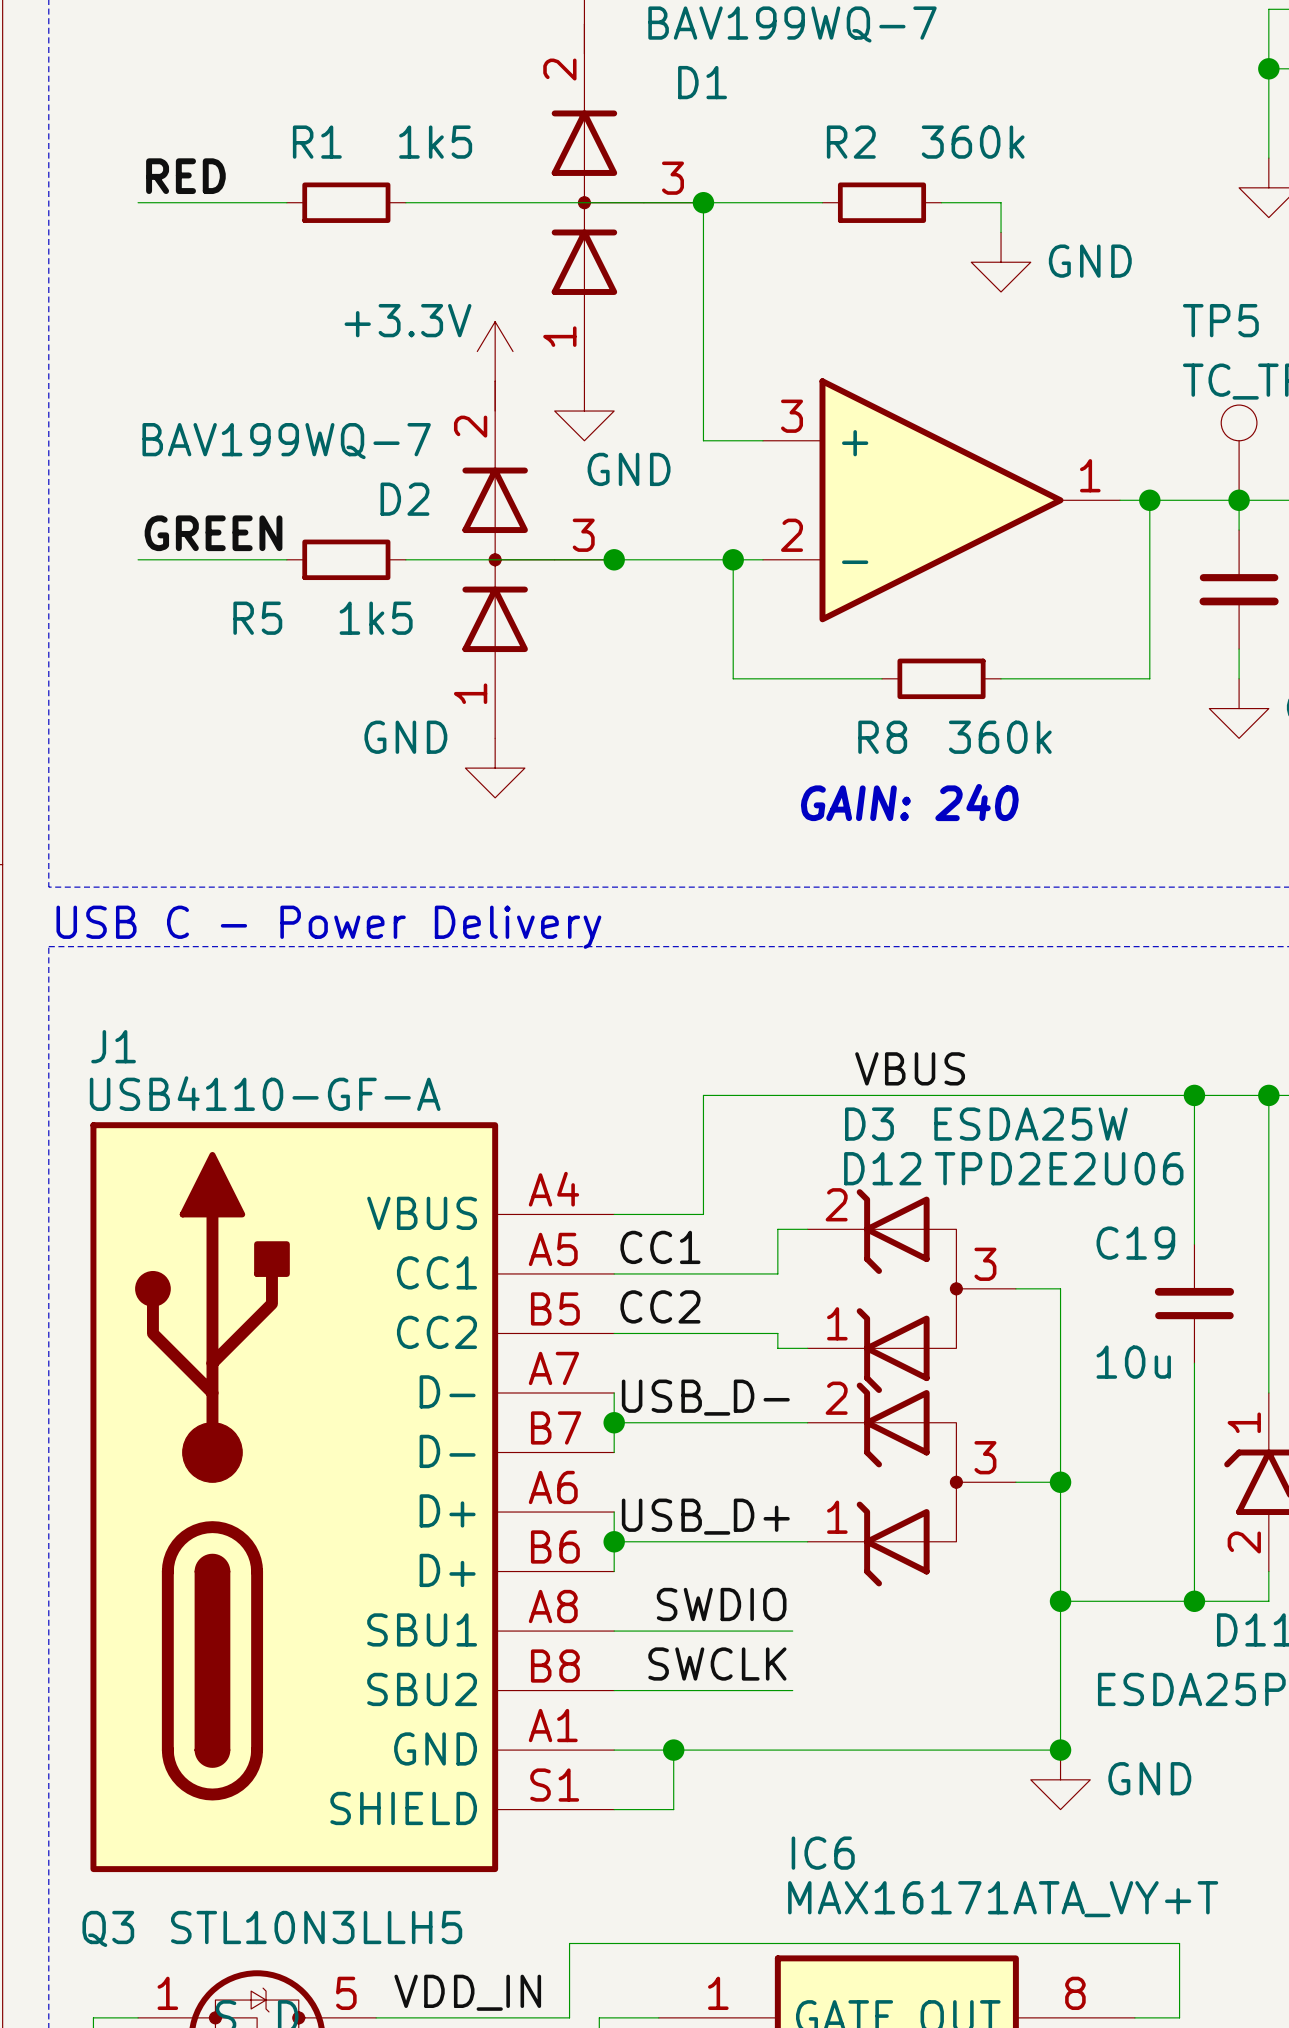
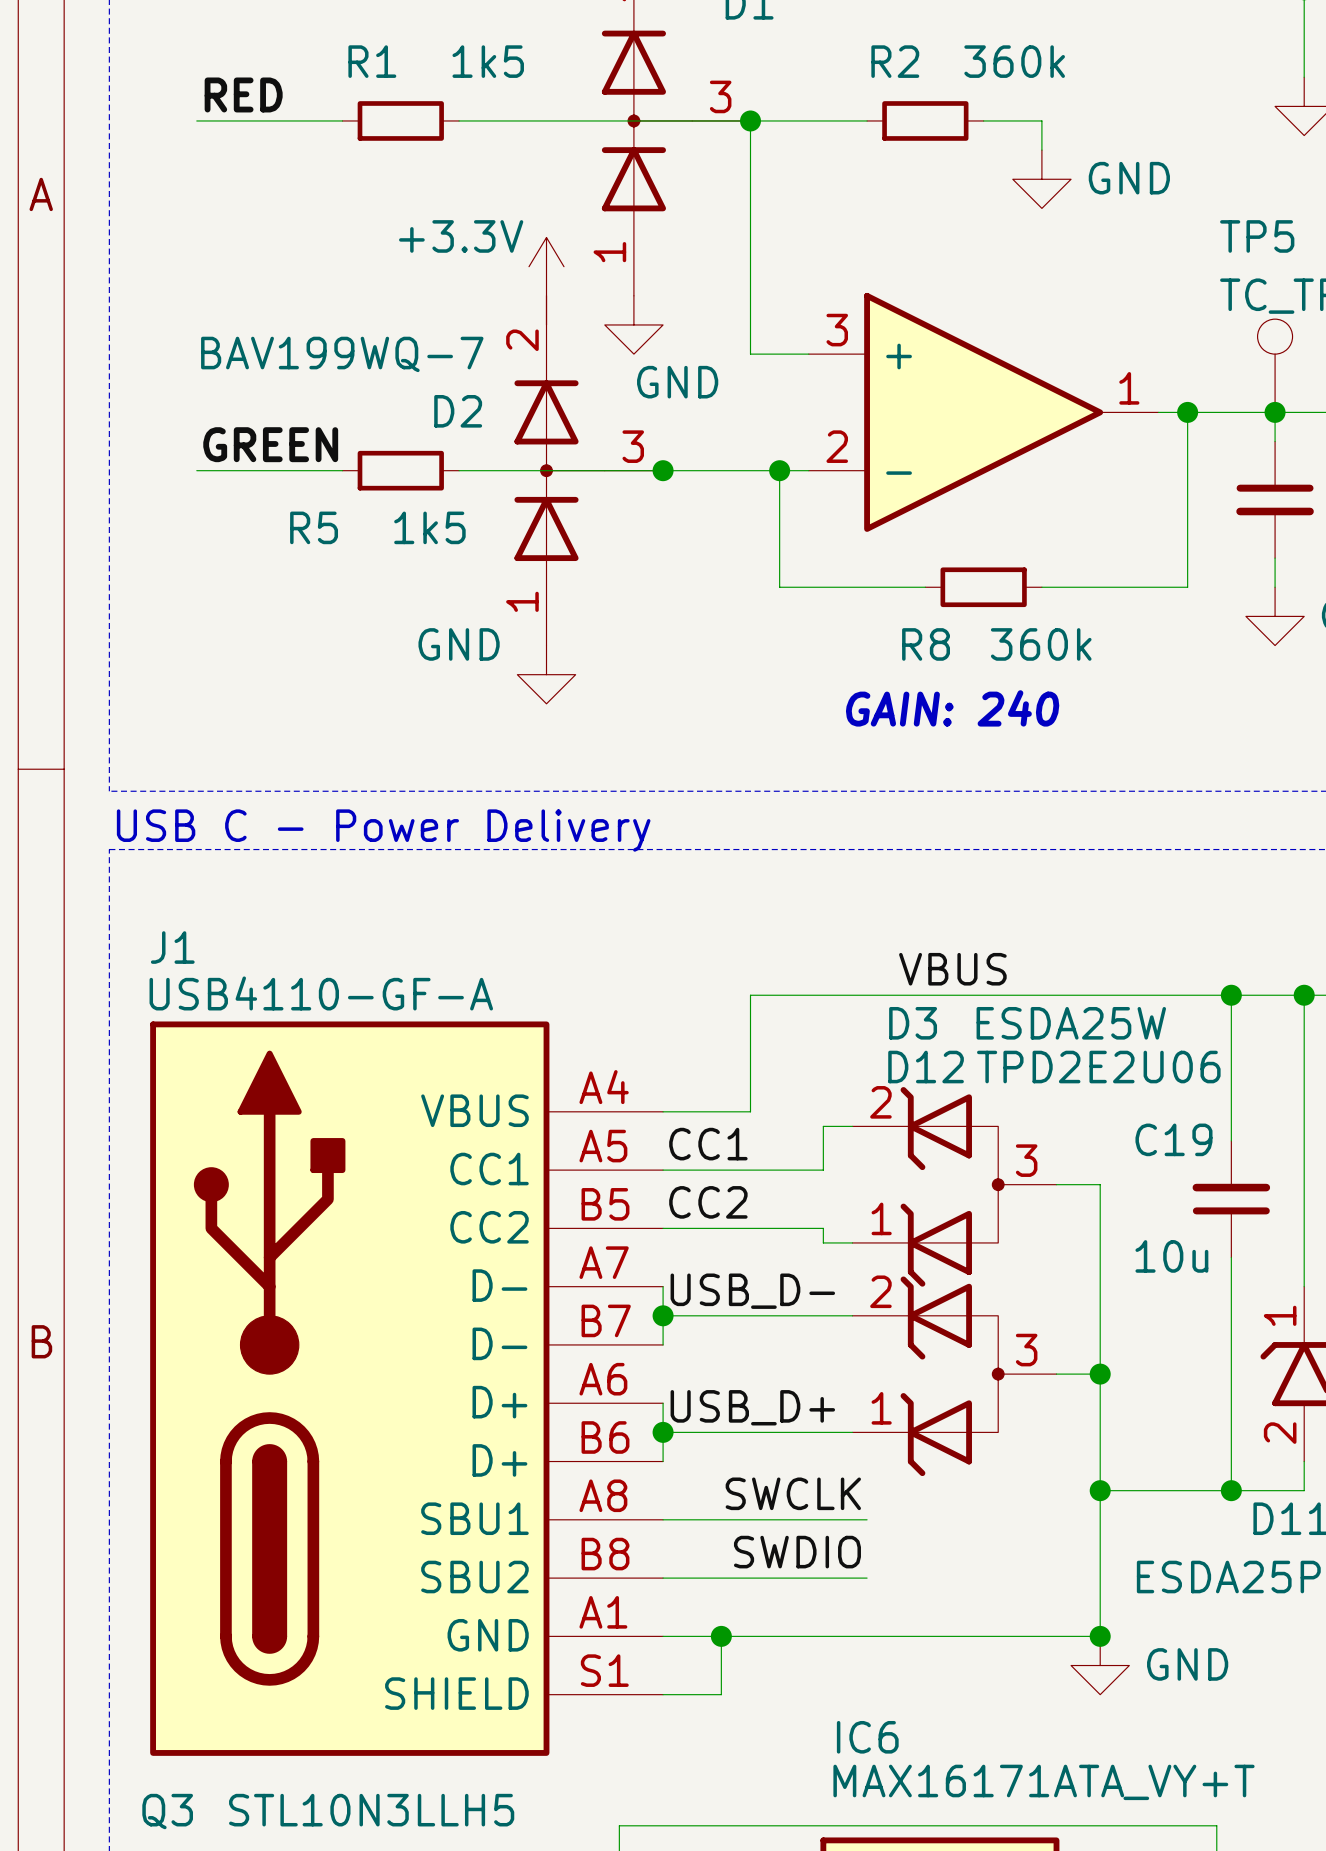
label position: SWDIO (721, 1604) -> SWDIO (797, 1552)
wire: none -> (837, 1519) (867, 1519)
label position: SWCLK (717, 1664) -> SWCLK (793, 1493)
wire: none -> (837, 1578) (867, 1578)

